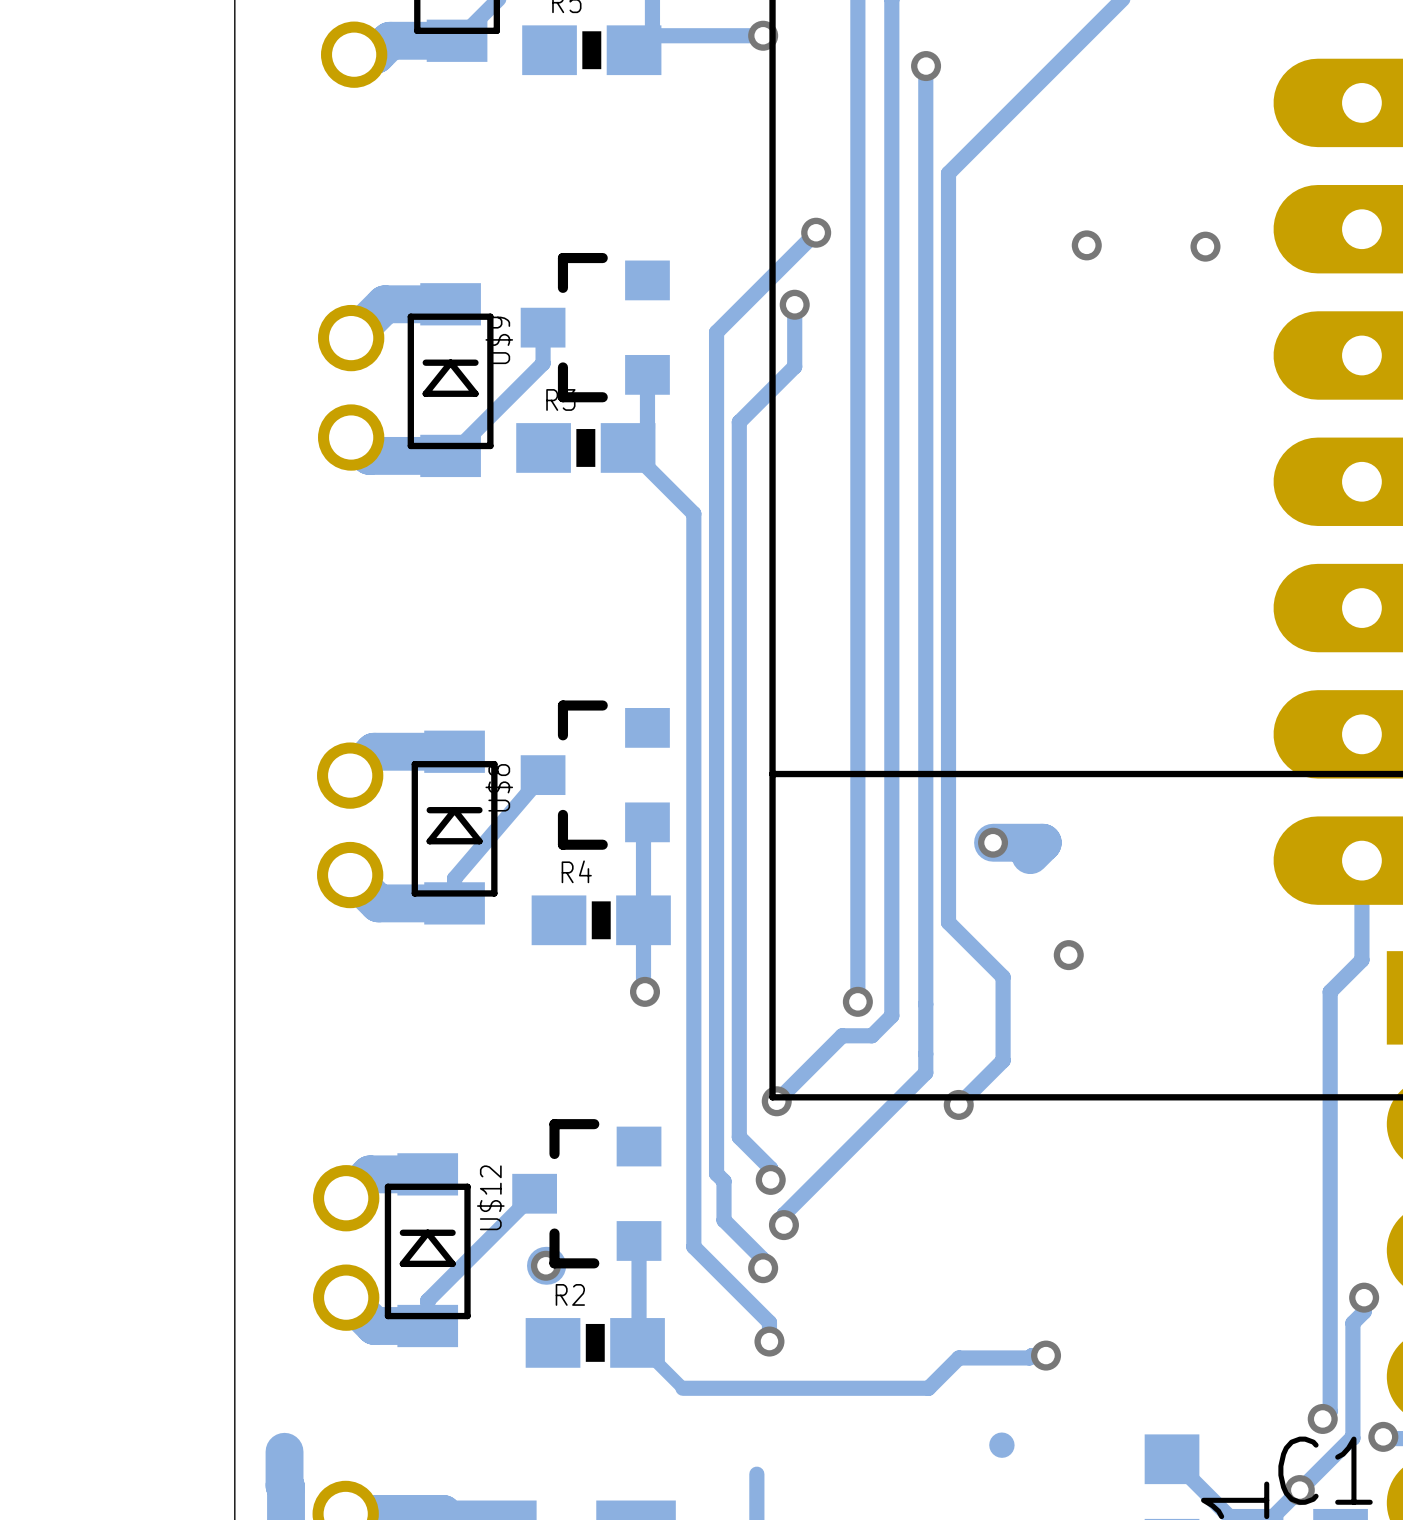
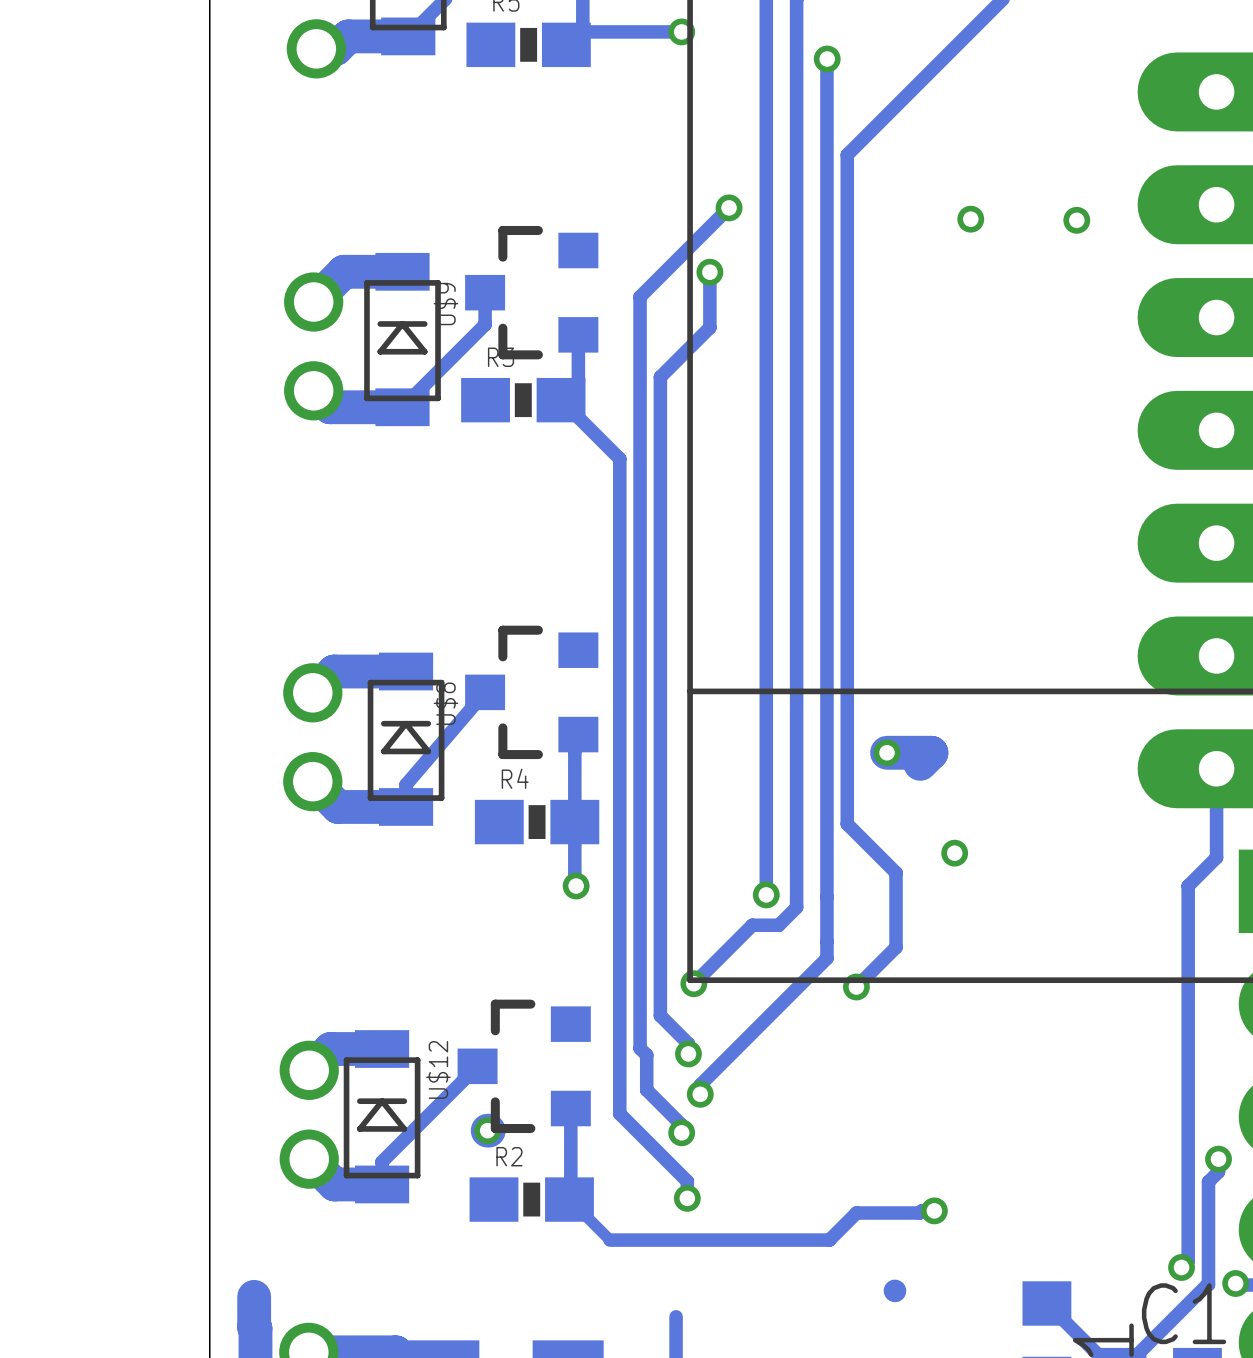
via: (1299, 1490) -> none

